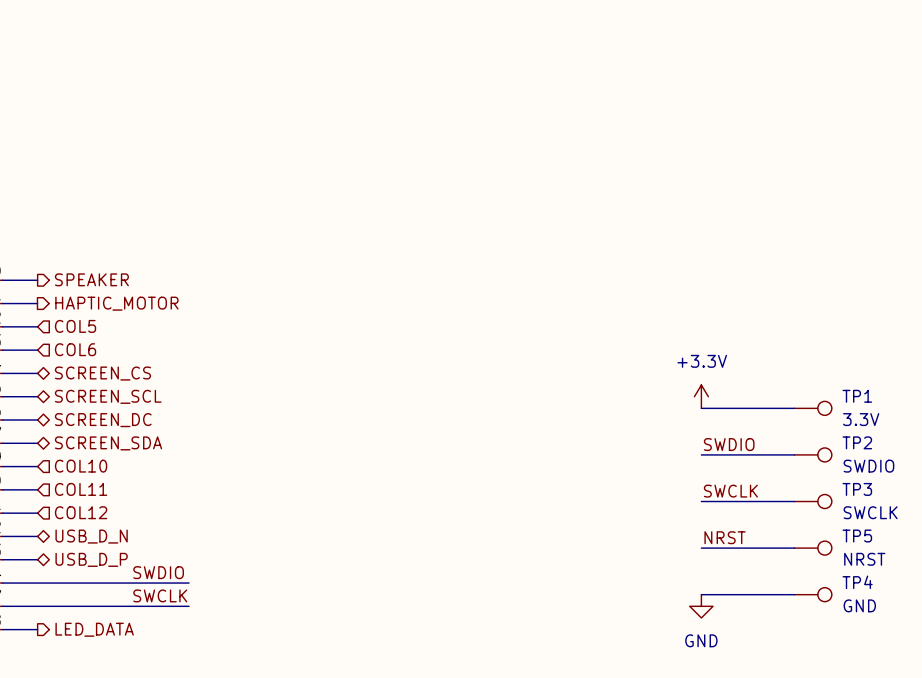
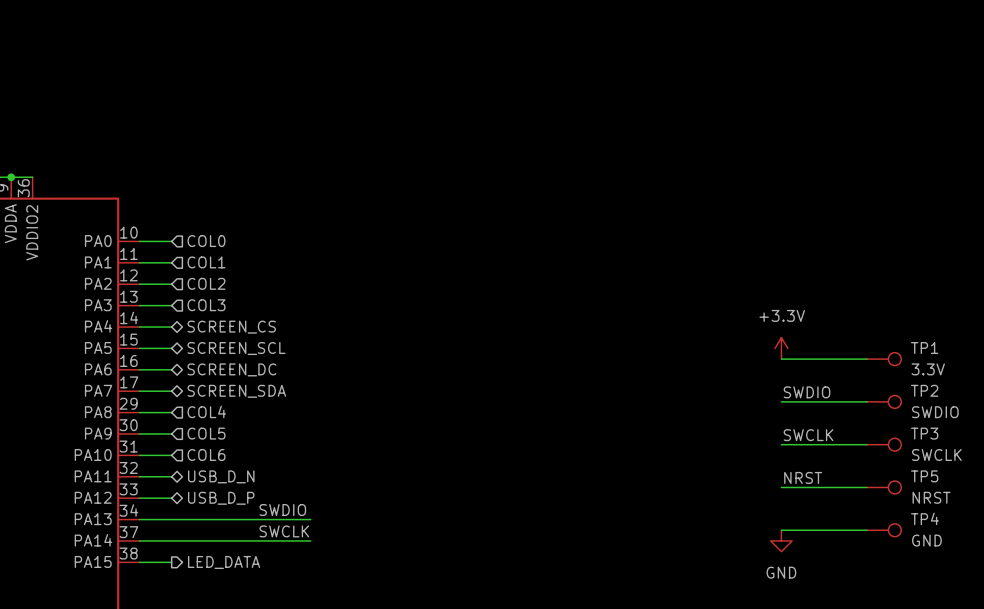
hierarchical label shape: output (91, 279) -> input (206, 241)
hierarchical label: SPEAKER (91, 279) -> COL0 (206, 241)
hierarchical label shape: output (116, 303) -> input (206, 262)
hierarchical label: HAPTIC_MOTOR (116, 303) -> COL1 (206, 262)
hierarchical label: COL5 (75, 326) -> COL2 (206, 283)
hierarchical label: COL6 (75, 349) -> COL3 (206, 305)
hierarchical label: COL10 (81, 466) -> COL4 (206, 411)
hierarchical label: COL11 (81, 489) -> COL5 (206, 433)
hierarchical label: COL12 (81, 512) -> COL6 (206, 454)

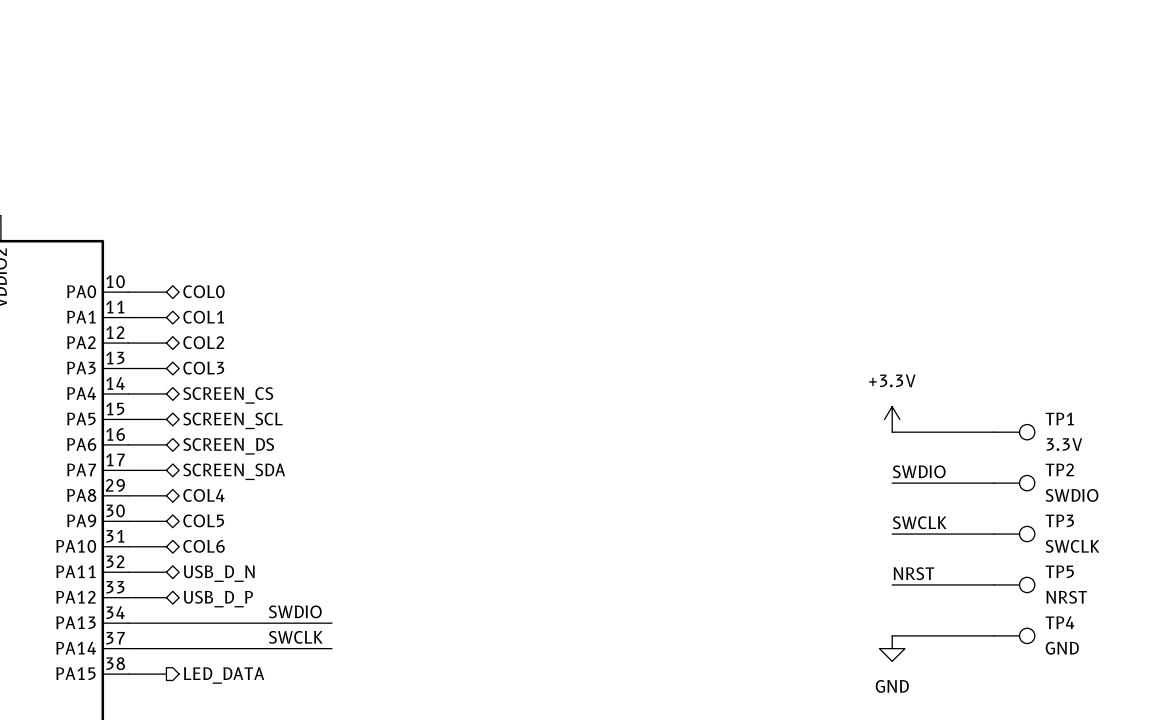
hierarchical label shape: input (206, 241) -> bidirectional (203, 291)
hierarchical label shape: input (206, 262) -> bidirectional (203, 317)
hierarchical label shape: input (206, 283) -> bidirectional (203, 342)
hierarchical label shape: input (206, 305) -> bidirectional (203, 368)
hierarchical label: SCREEN_DC (231, 369) -> SCREEN_DS (228, 446)
hierarchical label shape: input (206, 411) -> bidirectional (203, 495)
hierarchical label shape: input (206, 433) -> bidirectional (203, 520)
hierarchical label shape: input (206, 454) -> bidirectional (204, 546)

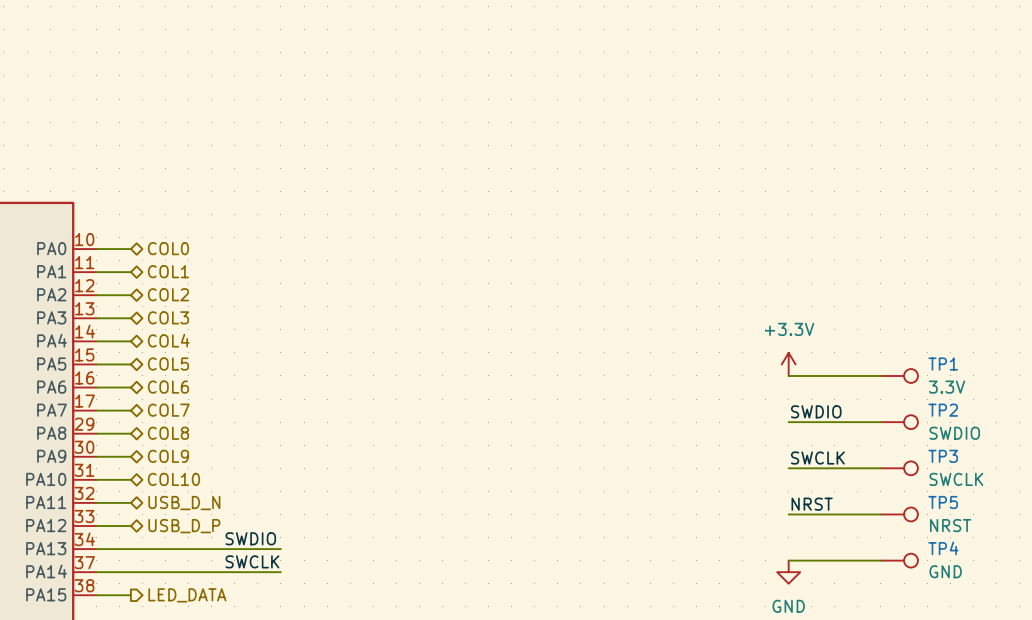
hierarchical label: SCREEN_CS (228, 395) -> COL4 (168, 340)
hierarchical label: SCREEN_SCL (232, 420) -> COL5 (168, 364)
hierarchical label: SCREEN_DS (228, 446) -> COL6 (168, 387)
hierarchical label: SCREEN_SDA (234, 471) -> COL7 (168, 410)
hierarchical label: COL4 (203, 495) -> COL8 (168, 433)
hierarchical label: COL5 (203, 520) -> COL9 (168, 456)
hierarchical label: COL6 (204, 546) -> COL10 (173, 479)

